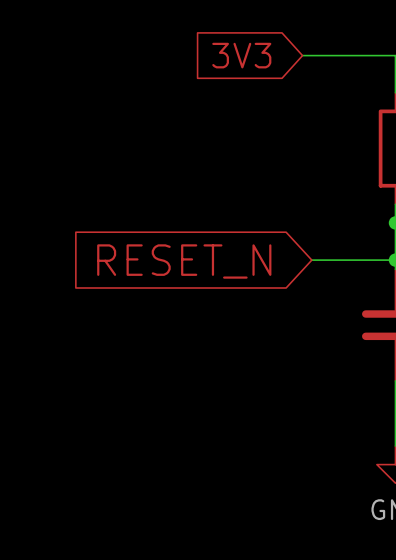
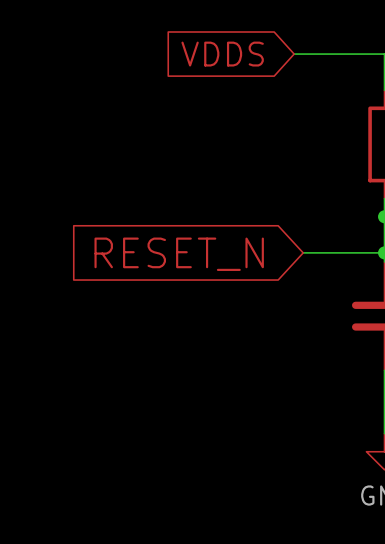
global label: 3V3 (241, 55) -> VDDS (222, 54)

